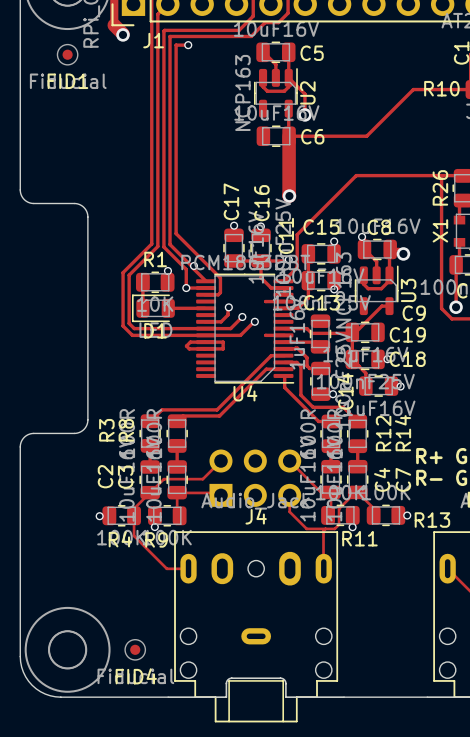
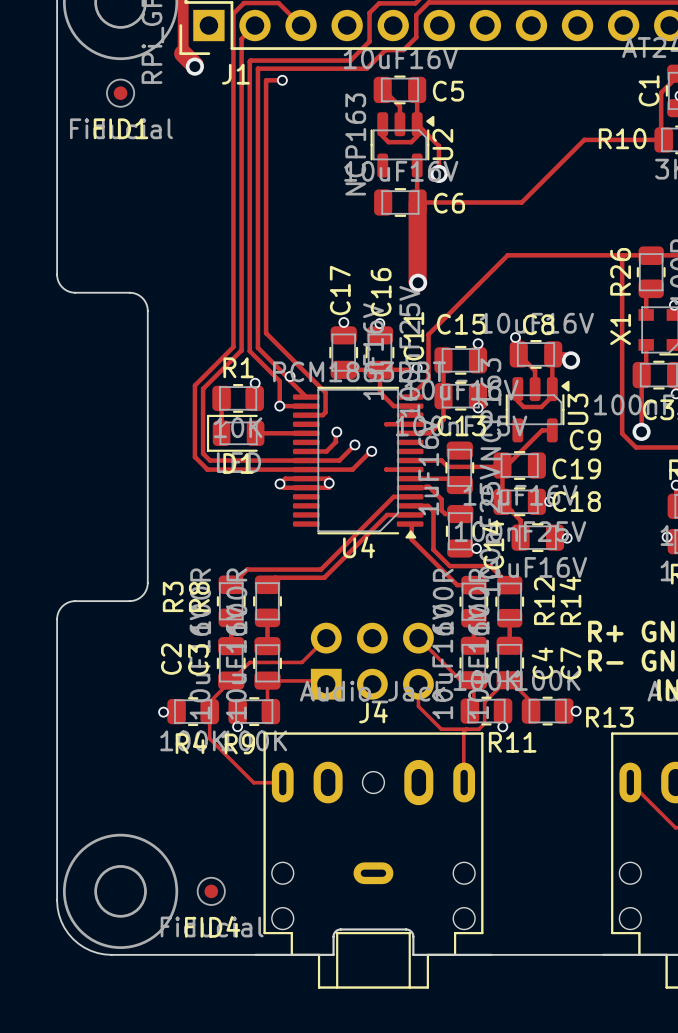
U2 footprint: [253, 68, 298, 118] -> [370, 112, 435, 178]
U3 footprint: [354, 265, 399, 316] -> [505, 377, 570, 443]
U4 footprint: [196, 273, 295, 384] -> [292, 386, 424, 539]
via: none -> (329, 483)
via: none -> (280, 483)

